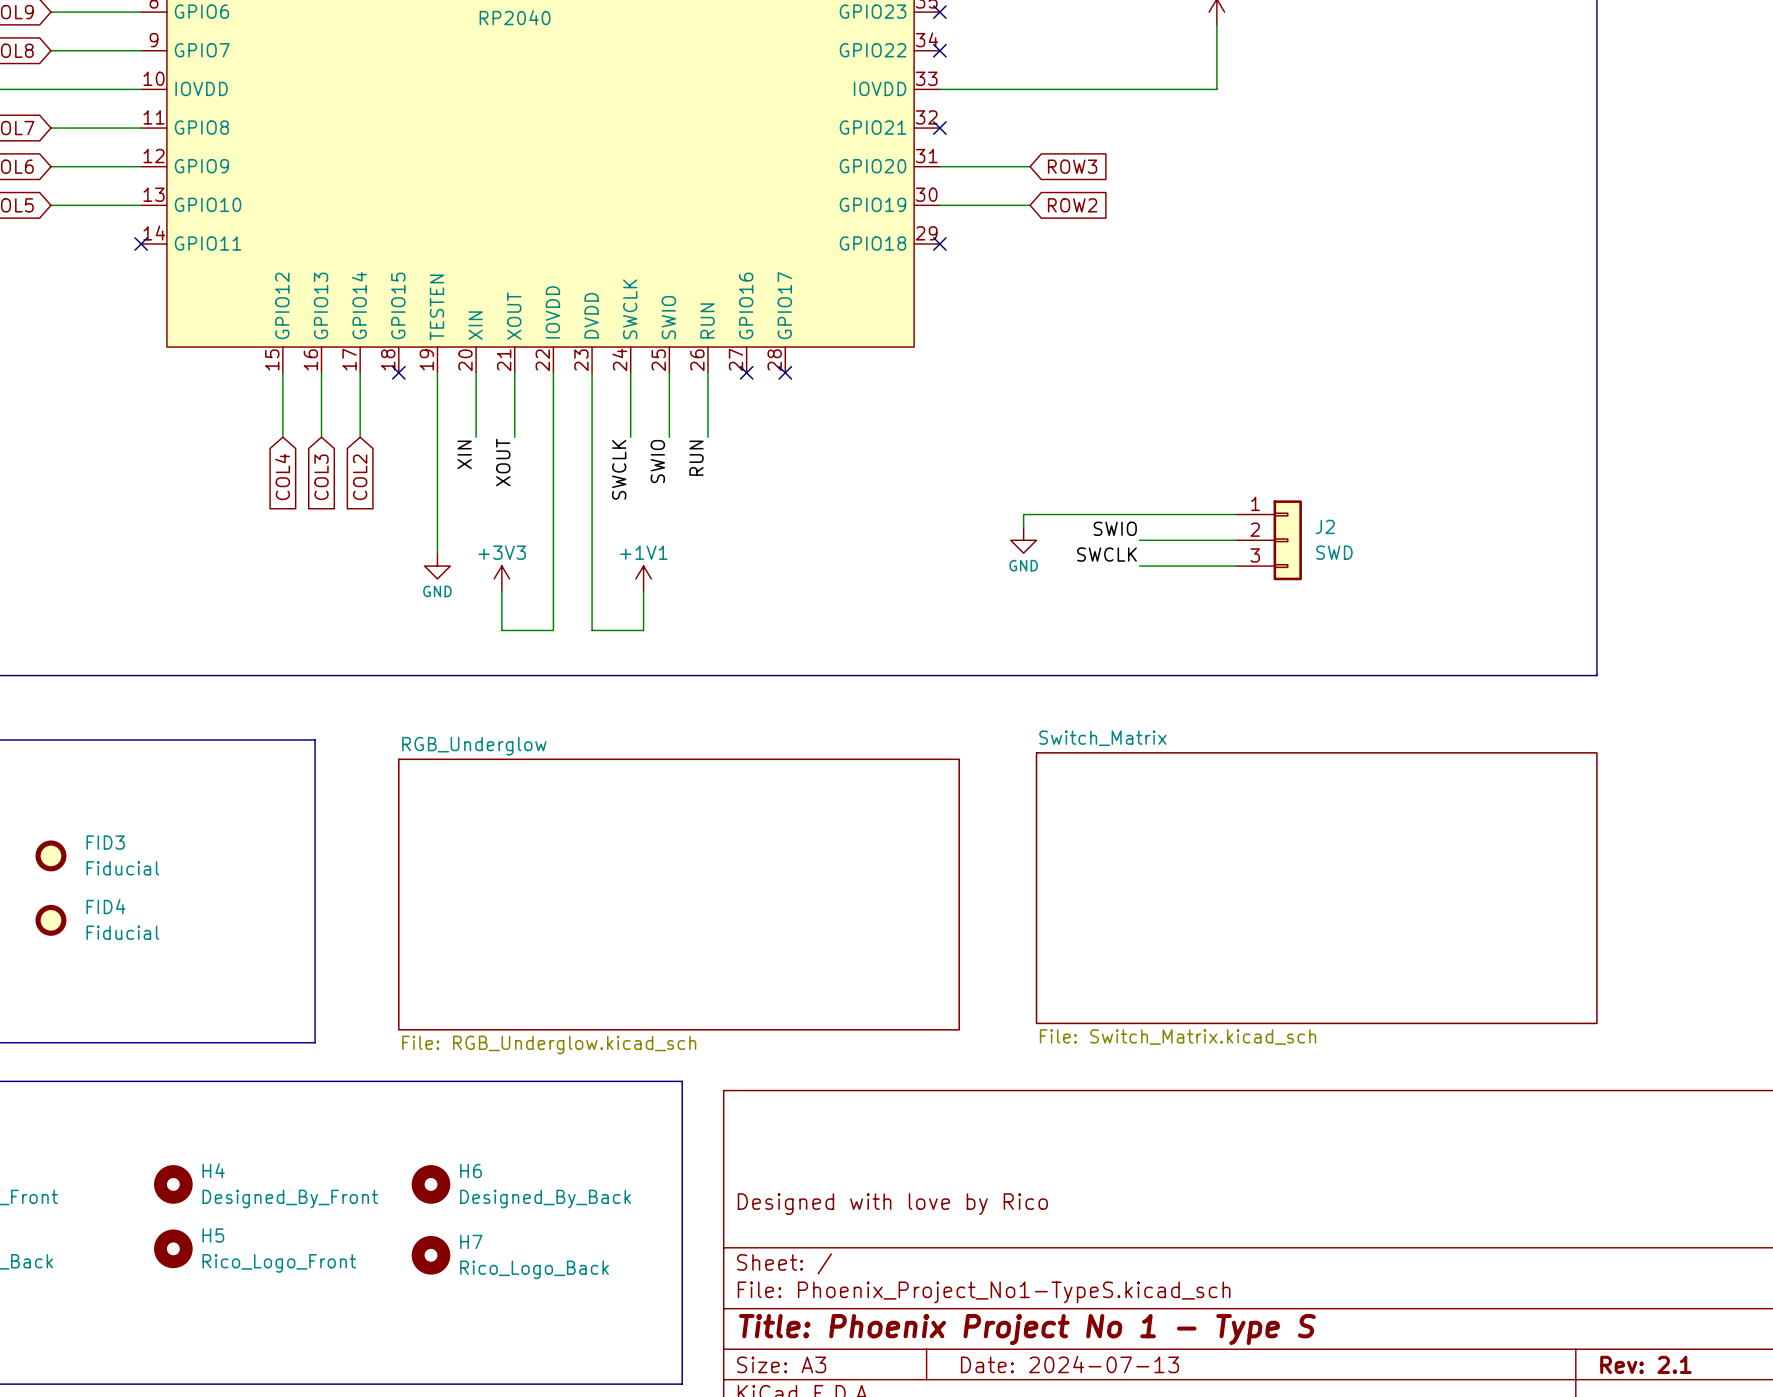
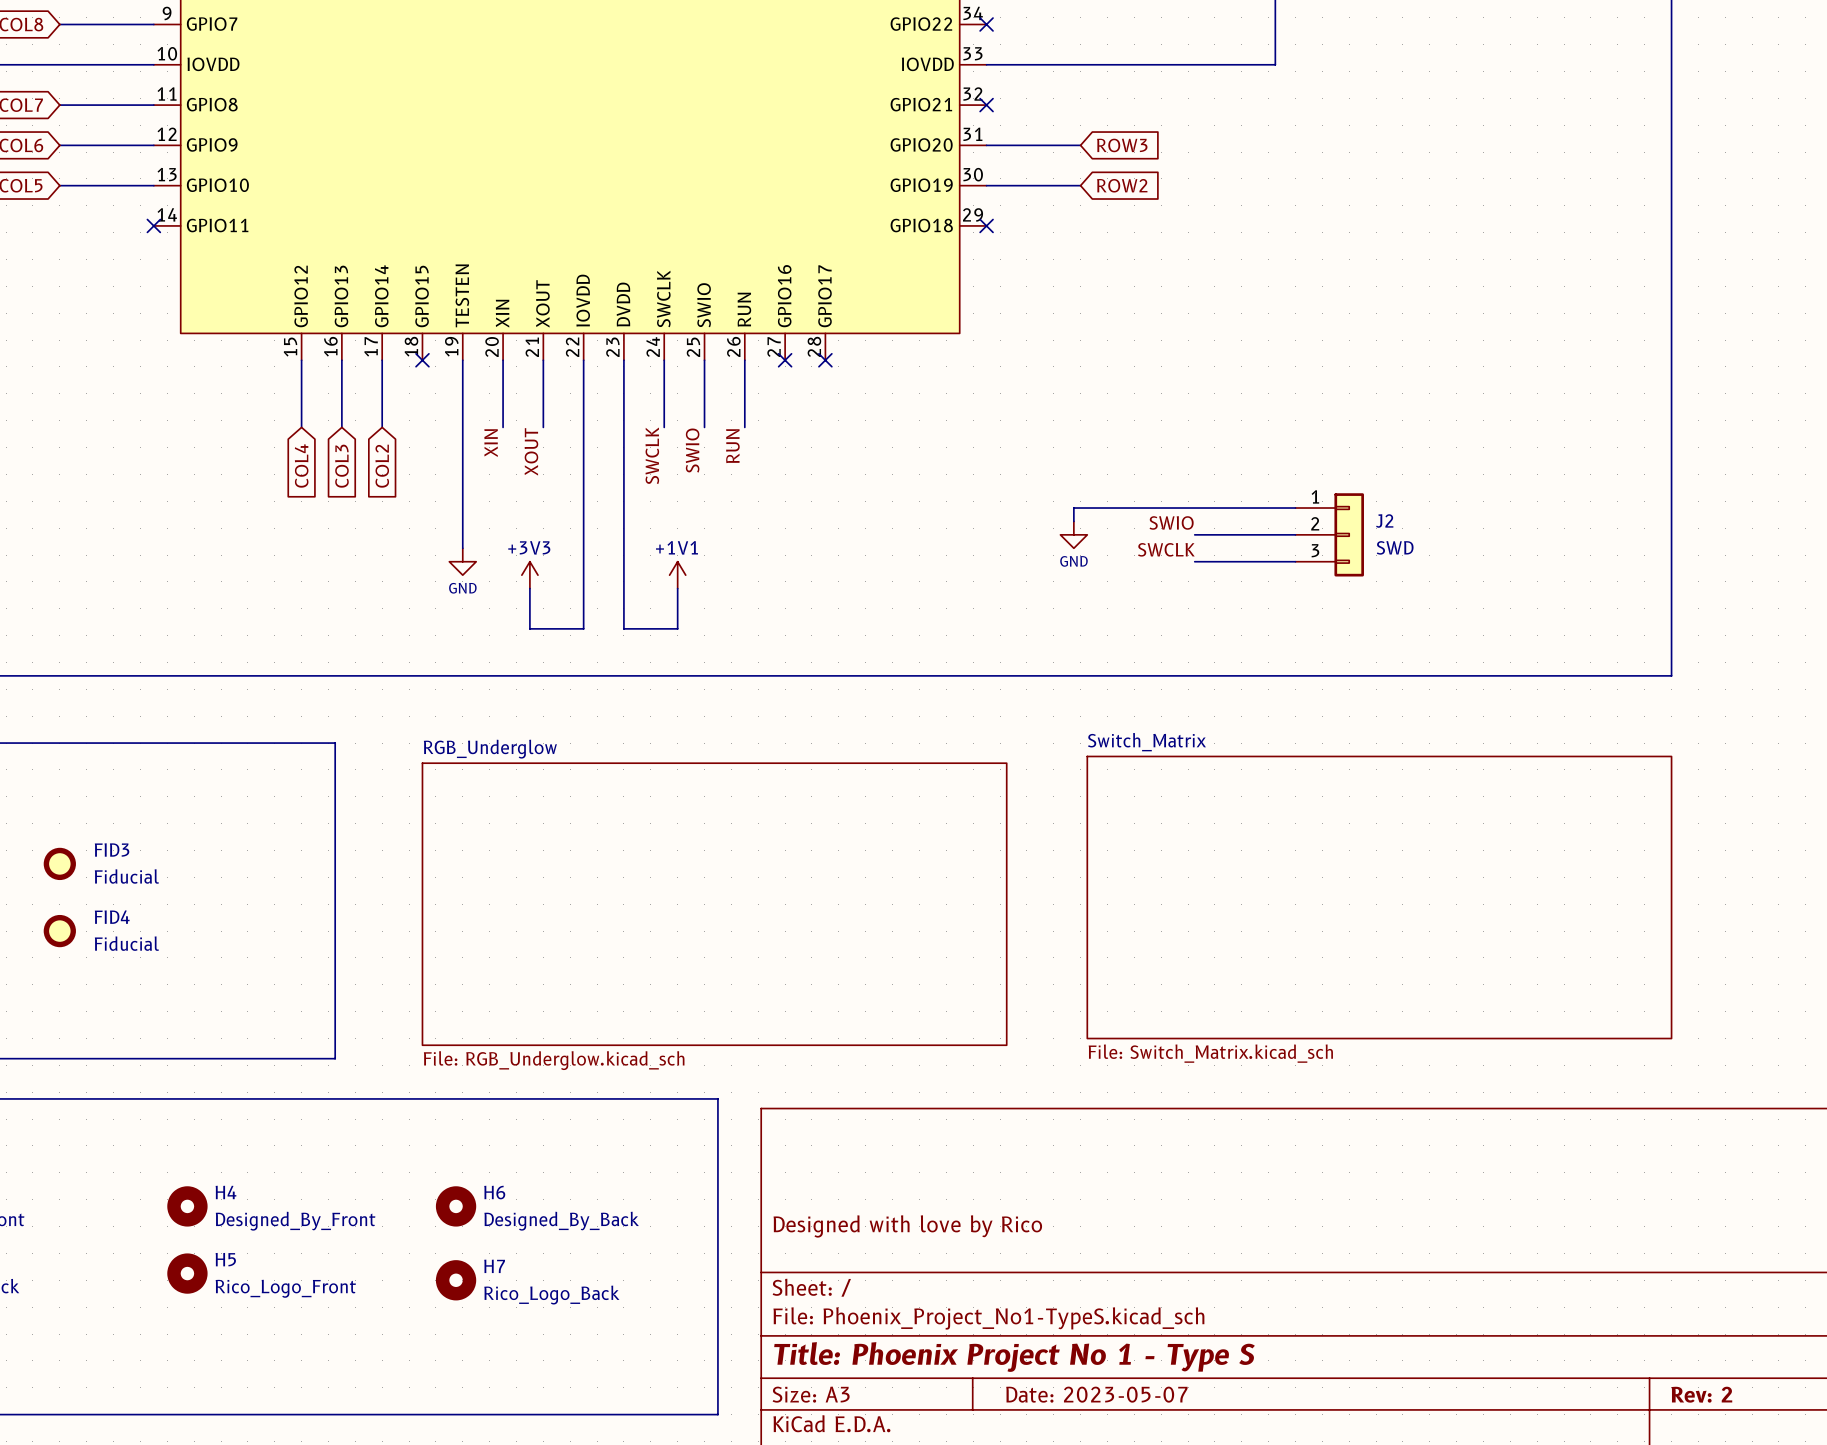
title block: Date: 2024-07-13 (1069, 1364) -> Date: 2023-05-07 (1096, 1394)
title block: Rev: 2.1 (1645, 1364) -> Rev: 2 (1701, 1394)

